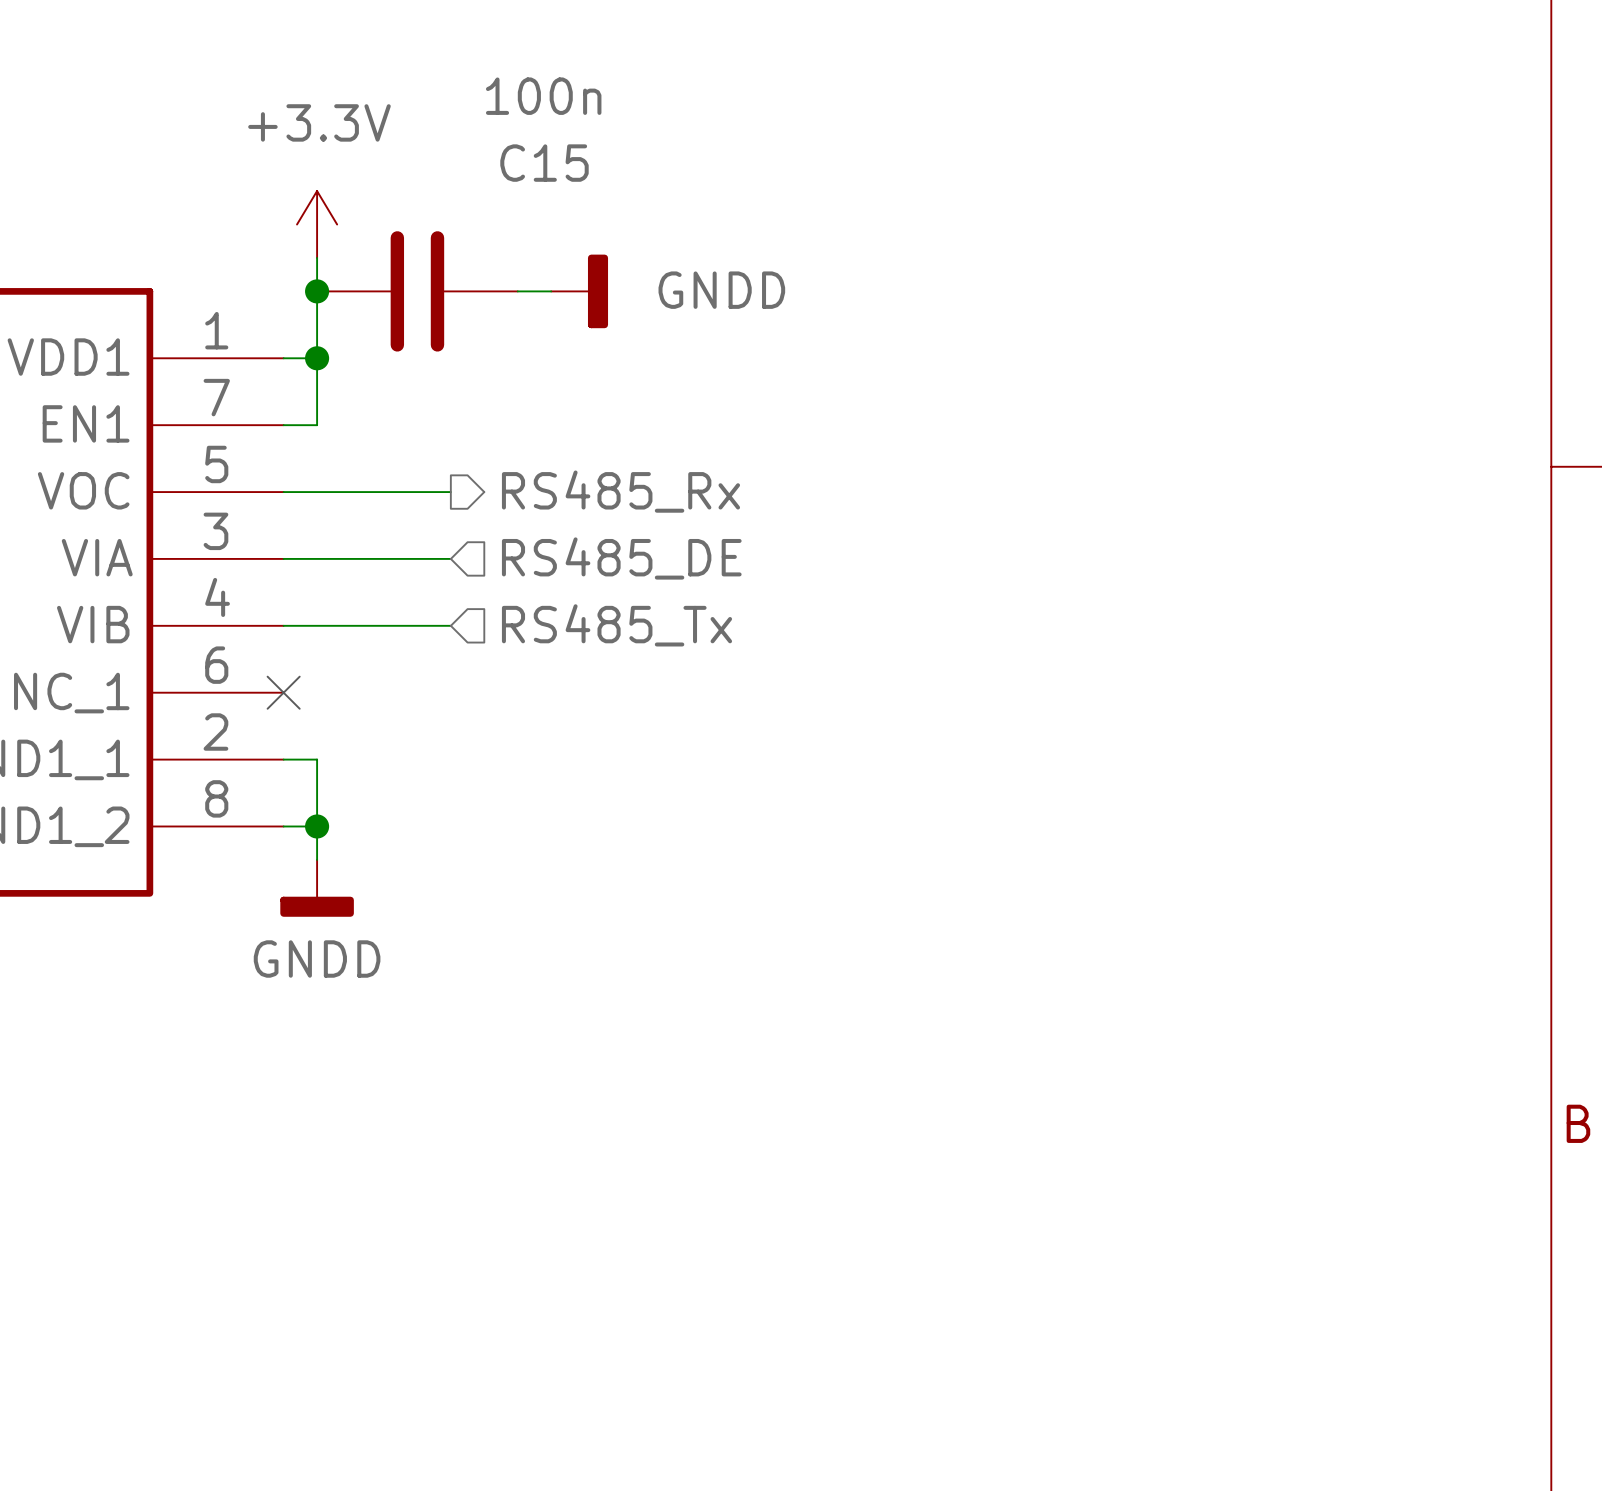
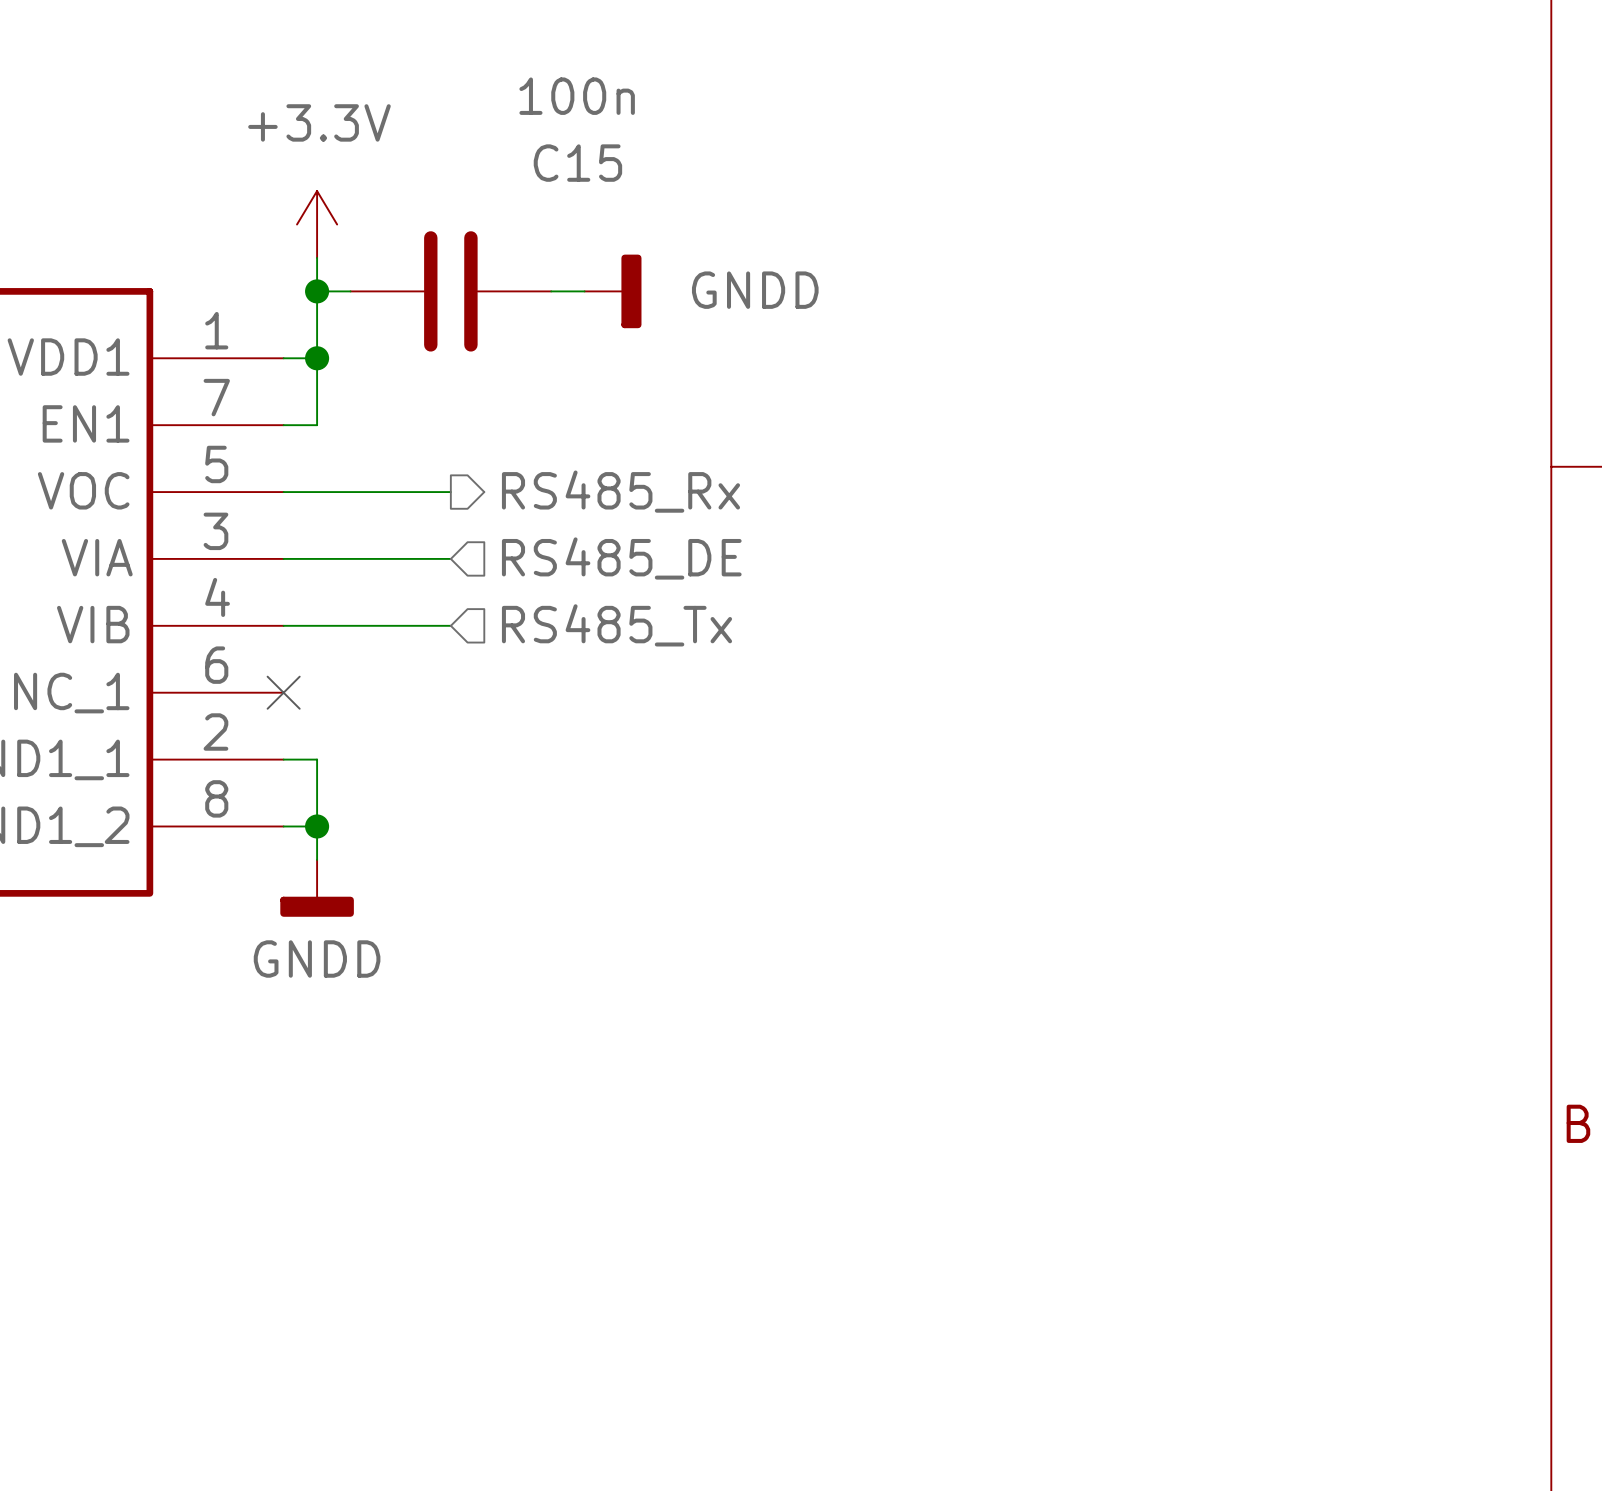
C15 position: (417, 291) -> (450, 291)
power symbol position: GNDD (579, 291) -> GNDD (613, 291)

